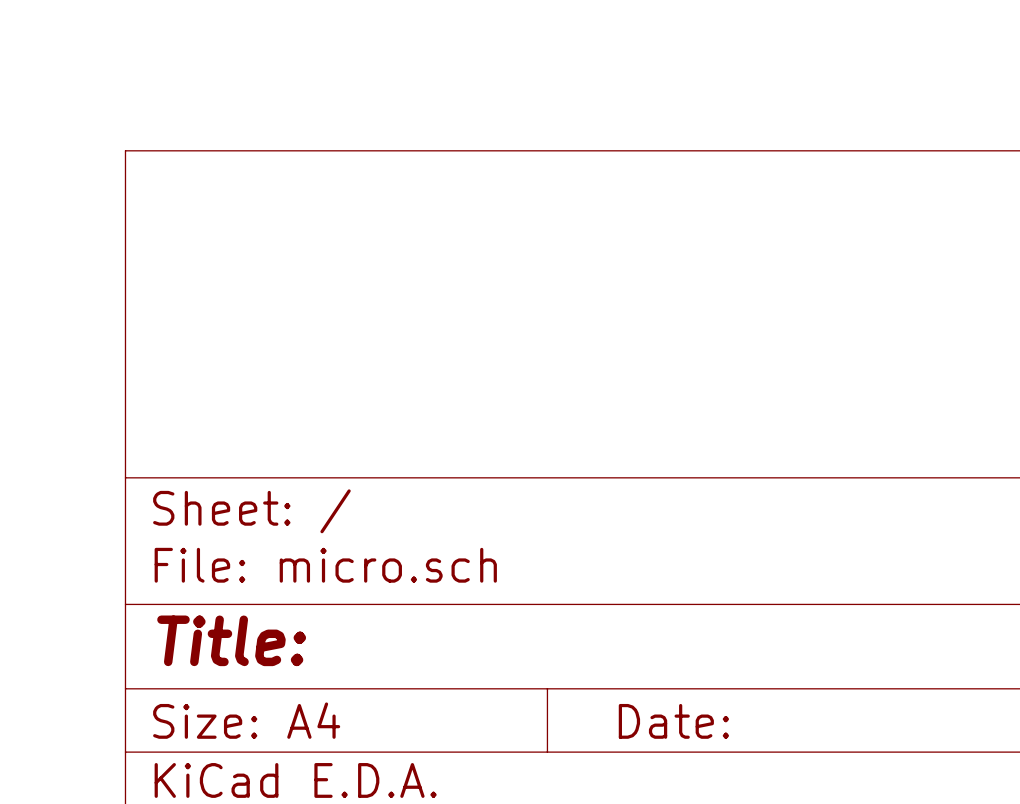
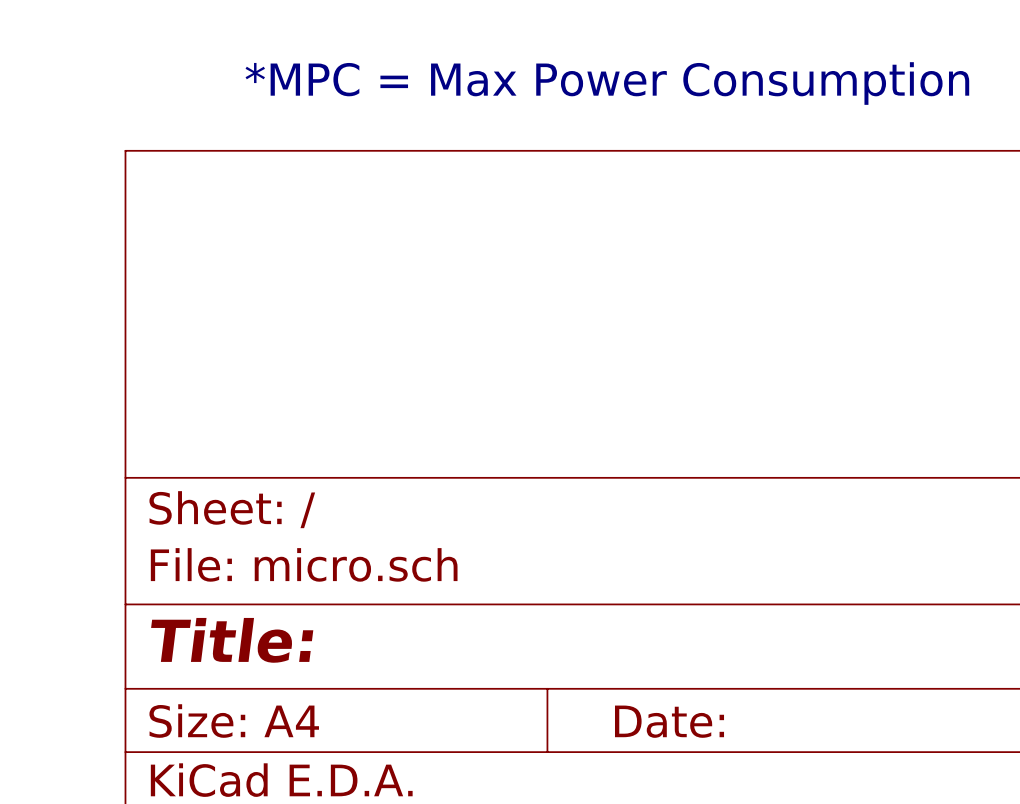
text: none -> *MPC = Max Power Consumption (607, 83)

